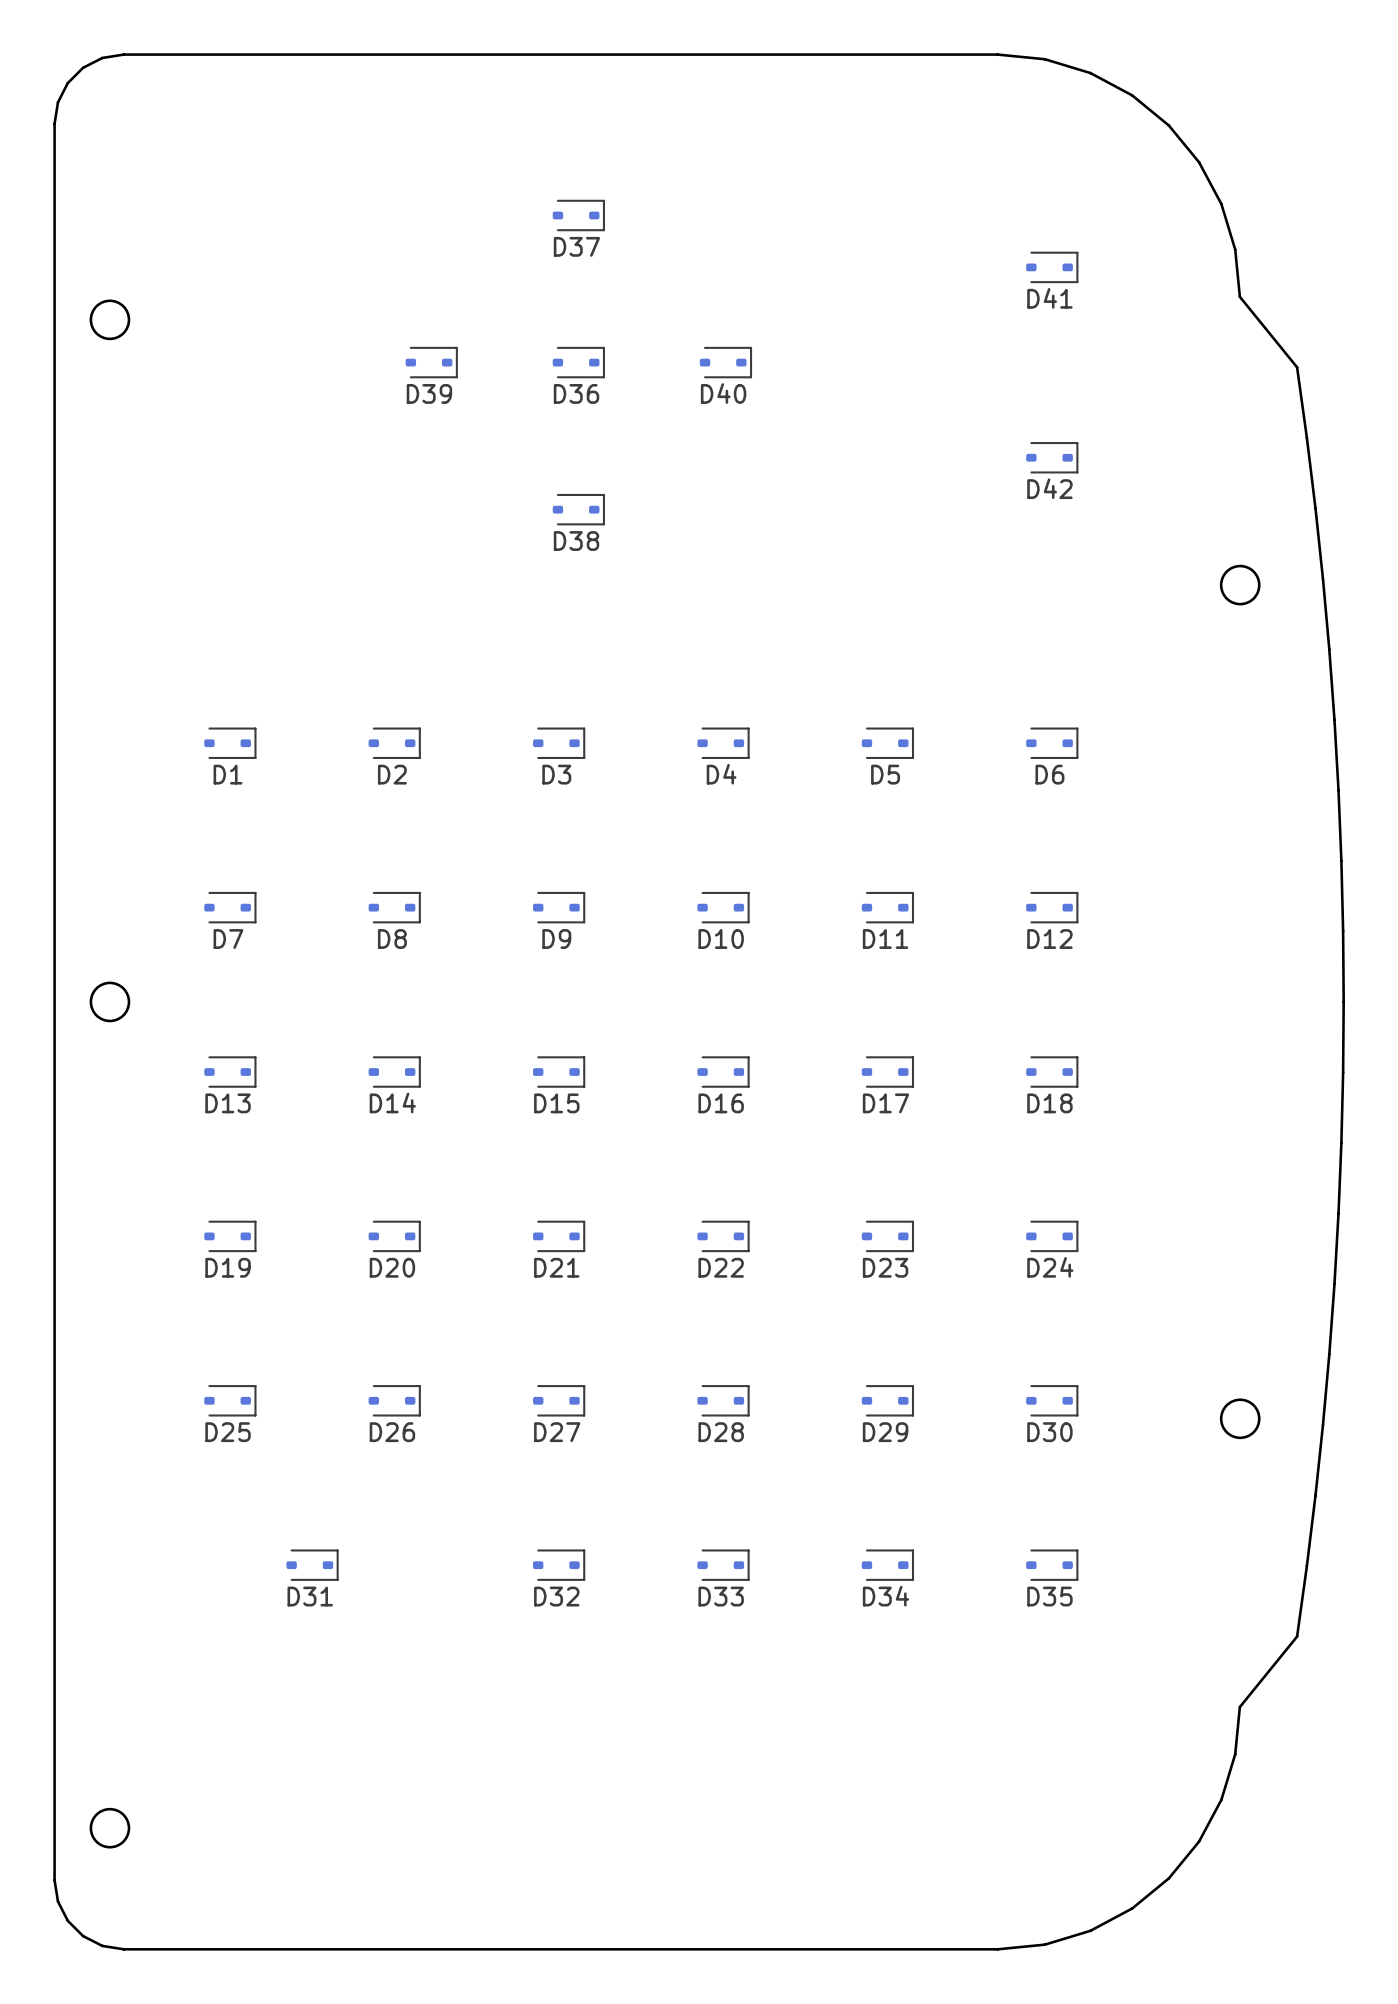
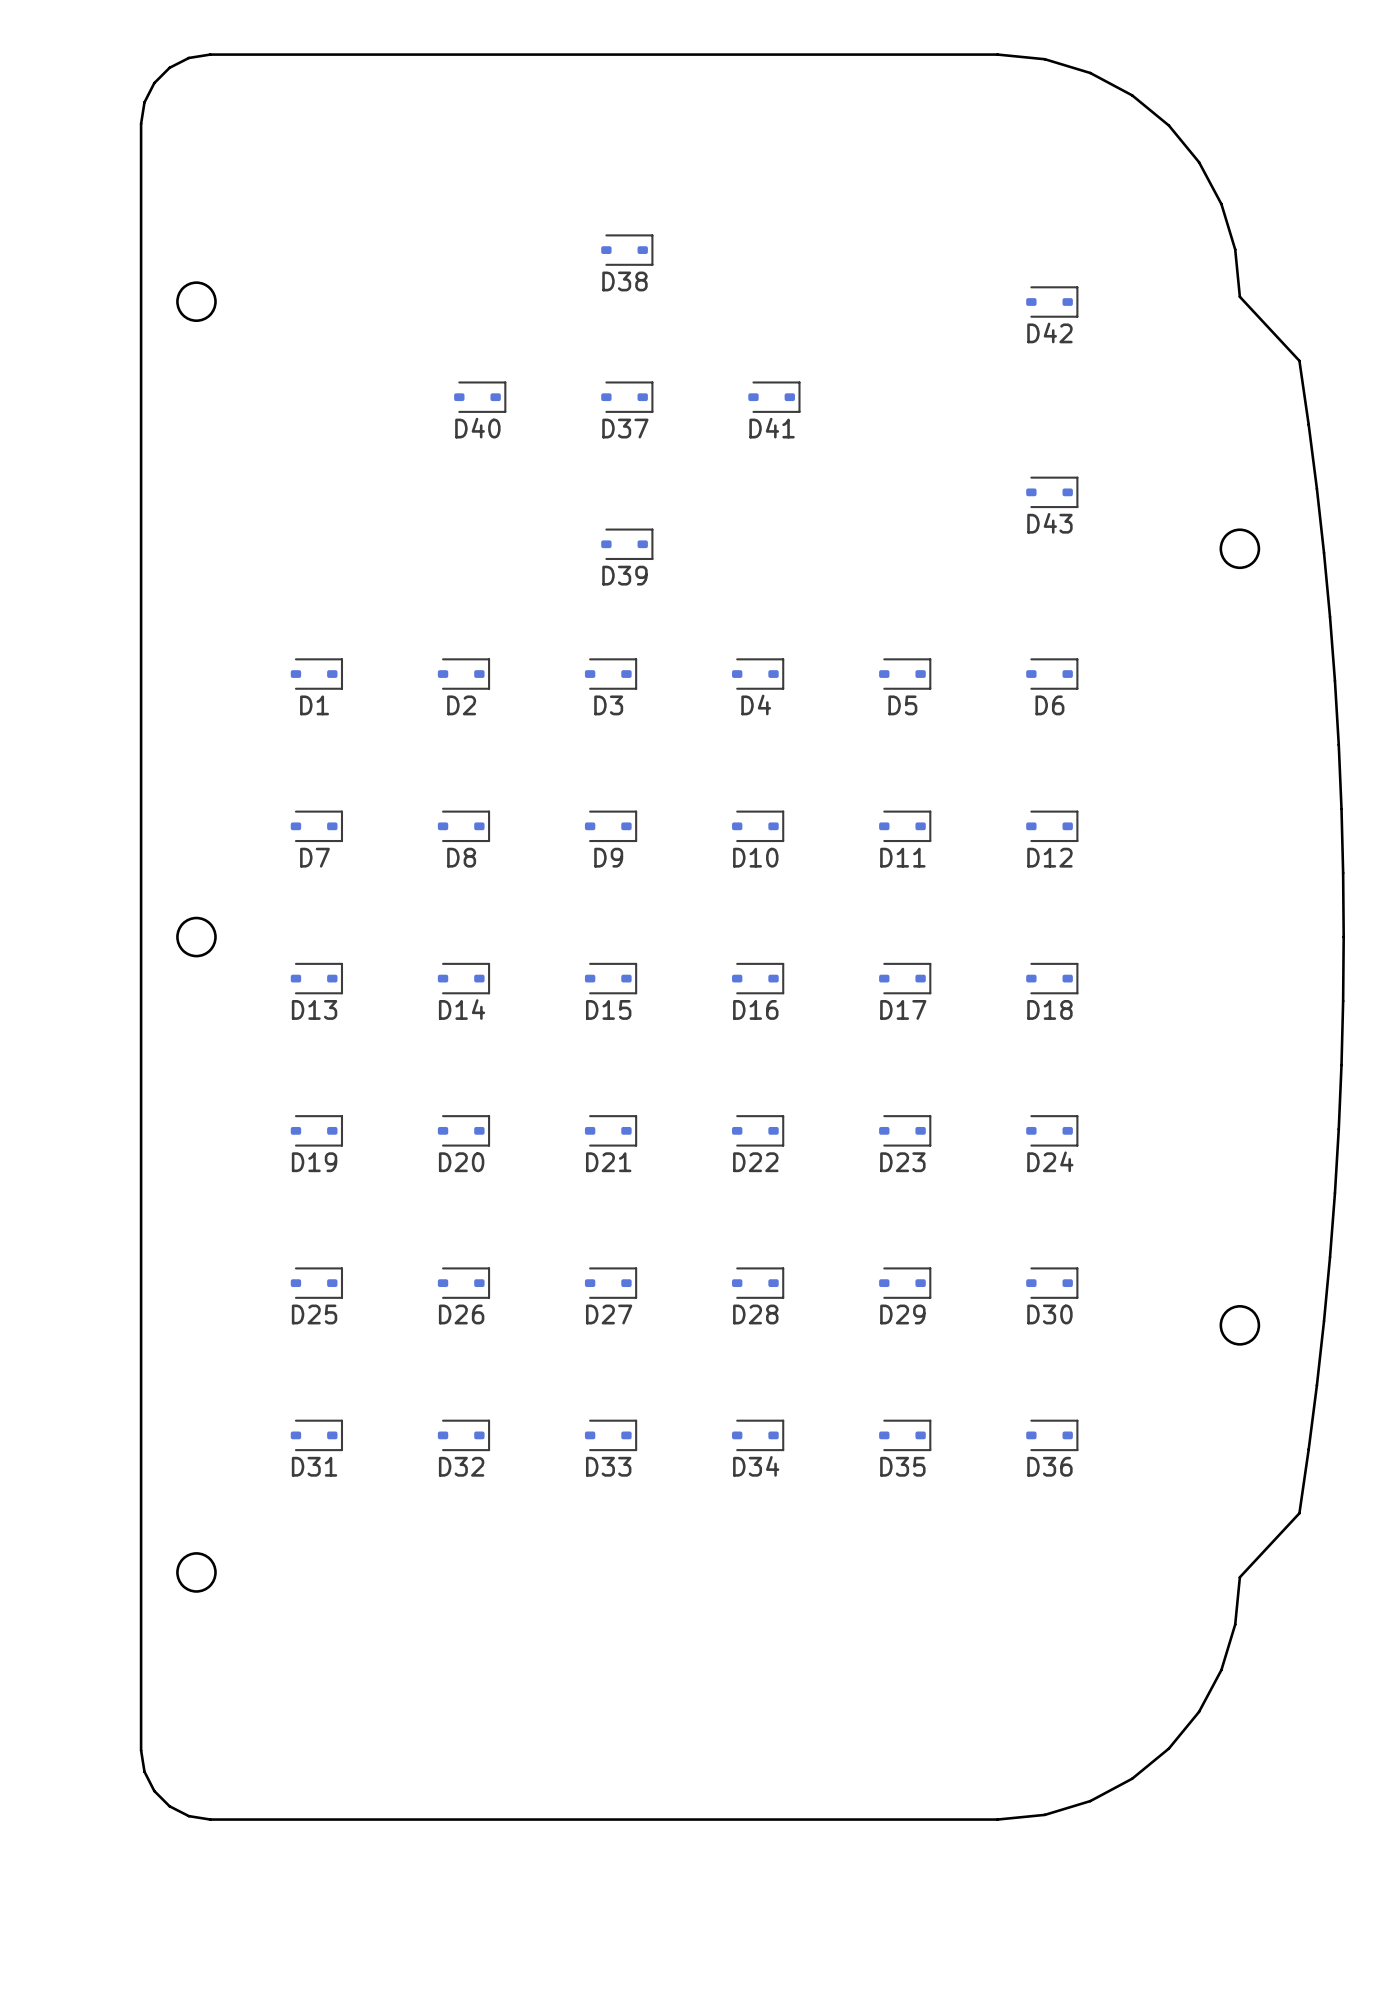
board edge: (210, 54) (123, 54) (102, 57) (83, 67) (67, 83) (57, 102) (54, 123) (54, 1880) (57, 1901) (67, 1920) (83, 1936) (102, 1945) (123, 1949) (997, 1949) (1044, 1944) (1090, 1930) (1132, 1908) (1168, 1878) (1199, 1841) (1221, 1799) (1235, 1754) (1239, 1707) (1297, 1636) (1315, 1495) (1329, 1354) (1341, 1142) (1343, 931) (1338, 790) (1329, 649) (1315, 508) (1297, 367) (1239, 296) -> (210, 54) (188, 57) (169, 67) (154, 83) (144, 102) (141, 123) (141, 1750) (144, 1771) (154, 1791) (169, 1806) (188, 1816) (210, 1819) (997, 1819) (1044, 1814) (1090, 1801) (1132, 1778) (1168, 1748) (1199, 1711) (1221, 1670) (1235, 1624) (1239, 1577) (1299, 1513) (1324, 1321) (1334, 1193) (1341, 1065) (1343, 937) (1338, 744) (1324, 552) (1308, 424) (1299, 360) (1239, 296)
D37 position: (578, 215) -> (627, 397)
D41 position: (1052, 267) -> (774, 397)
round board edge position: (109, 319) -> (196, 301)
D39 position: (431, 362) -> (627, 544)
D36 position: (578, 362) -> (1052, 1435)
D40 position: (725, 362) -> (480, 397)
D42 position: (1052, 457) -> (1052, 302)
D43: none -> (1052, 492)
D38 position: (578, 509) -> (627, 250)
round board edge position: (1240, 585) -> (1239, 548)
D1 position: (230, 743) -> (316, 674)
D2 position: (394, 743) -> (463, 674)
D3 position: (559, 743) -> (611, 674)
D4 position: (723, 743) -> (758, 674)
D5 position: (887, 743) -> (905, 674)
D6 position: (1052, 743) -> (1052, 674)
D7 position: (230, 907) -> (316, 826)
D8 position: (394, 907) -> (463, 826)
D9 position: (559, 907) -> (611, 826)
D10 position: (723, 907) -> (758, 826)
D11 position: (887, 907) -> (905, 826)
D12 position: (1052, 907) -> (1052, 826)
round board edge position: (109, 1001) -> (196, 937)
D13 position: (230, 1072) -> (316, 978)
D14 position: (394, 1072) -> (463, 978)
D15 position: (559, 1072) -> (611, 978)
D16 position: (723, 1072) -> (758, 978)
D17 position: (887, 1072) -> (905, 978)
D18 position: (1052, 1072) -> (1052, 978)
D19 position: (230, 1236) -> (316, 1130)
D20 position: (394, 1236) -> (463, 1130)
D21 position: (559, 1236) -> (611, 1130)
D22 position: (723, 1236) -> (758, 1130)
D23 position: (887, 1236) -> (905, 1130)
D24 position: (1052, 1236) -> (1052, 1130)
D25 position: (230, 1400) -> (316, 1283)
D26 position: (394, 1400) -> (463, 1283)
D27 position: (559, 1400) -> (611, 1283)
D28 position: (723, 1400) -> (758, 1283)
D29 position: (887, 1400) -> (905, 1283)
D30 position: (1052, 1400) -> (1052, 1283)
round board edge position: (1240, 1418) -> (1239, 1325)
D31 position: (312, 1565) -> (316, 1435)
D32 position: (559, 1565) -> (463, 1435)
D33 position: (723, 1565) -> (611, 1435)
D34 position: (887, 1565) -> (758, 1435)
D35 position: (1052, 1565) -> (905, 1435)
round board edge position: (109, 1828) -> (196, 1572)

